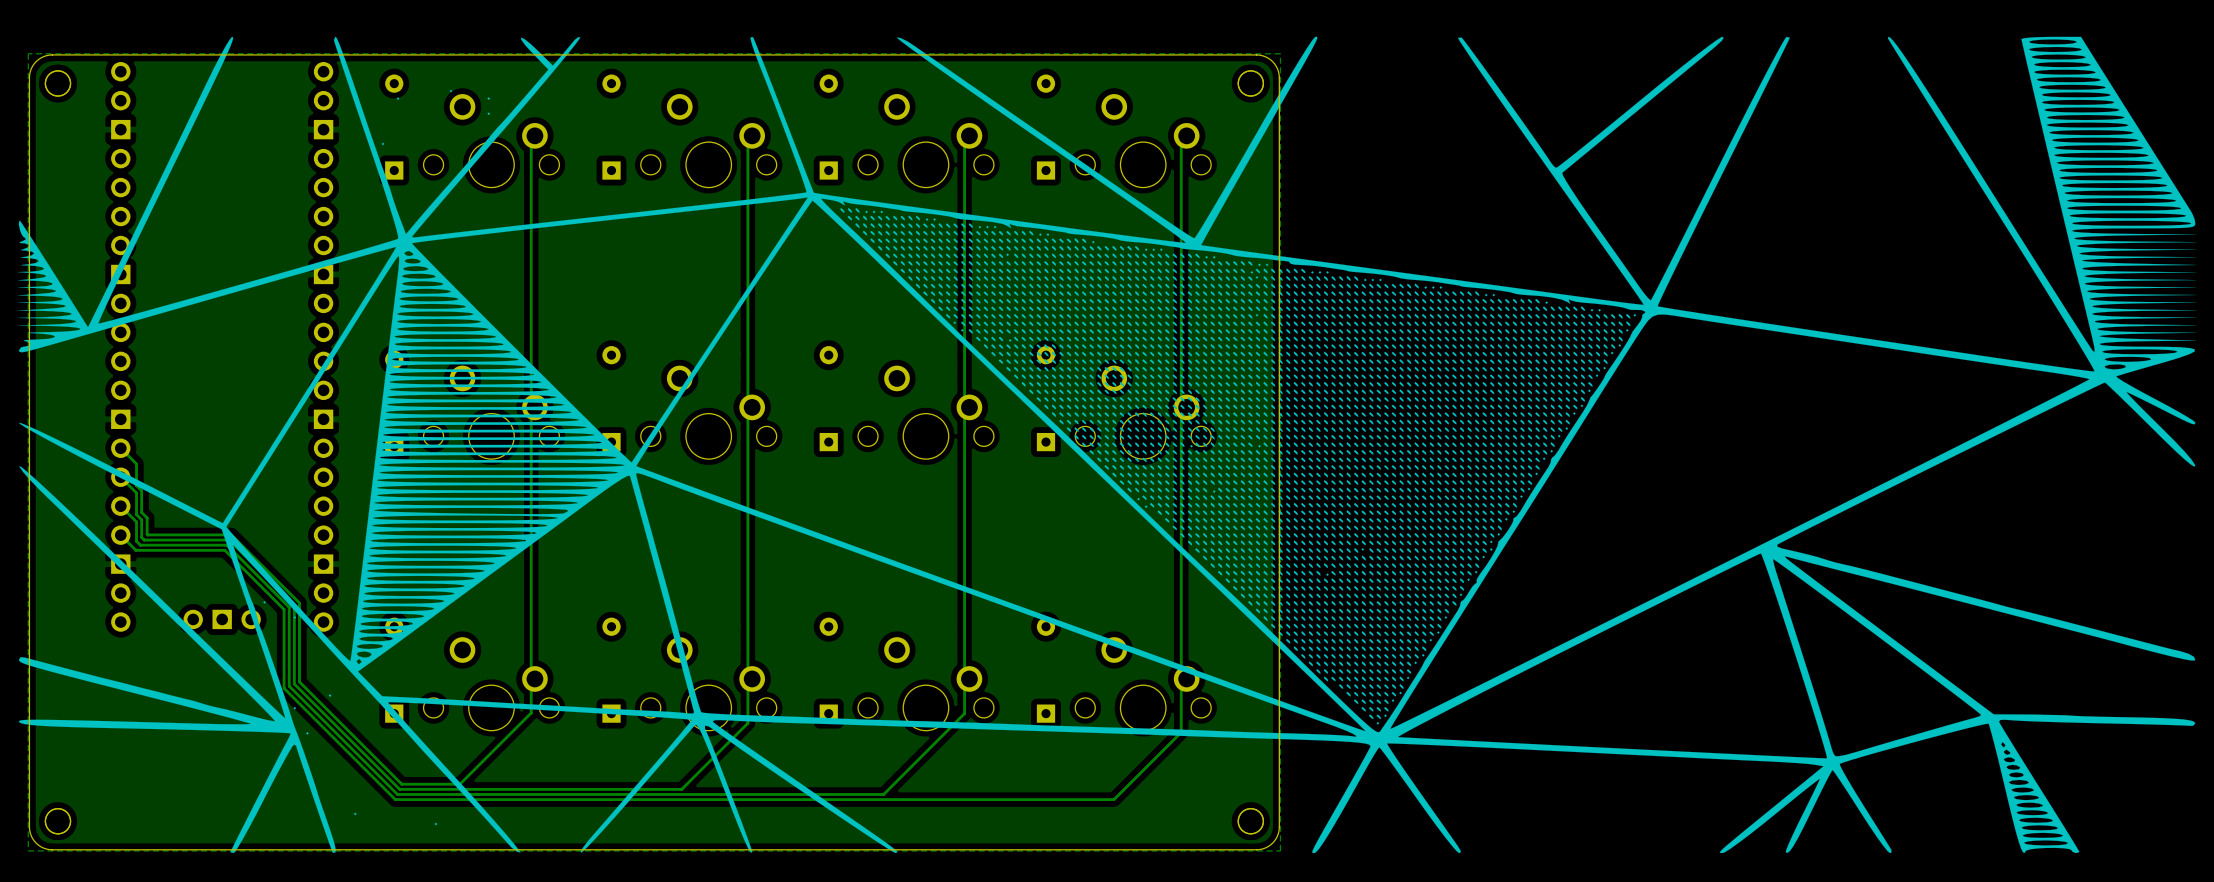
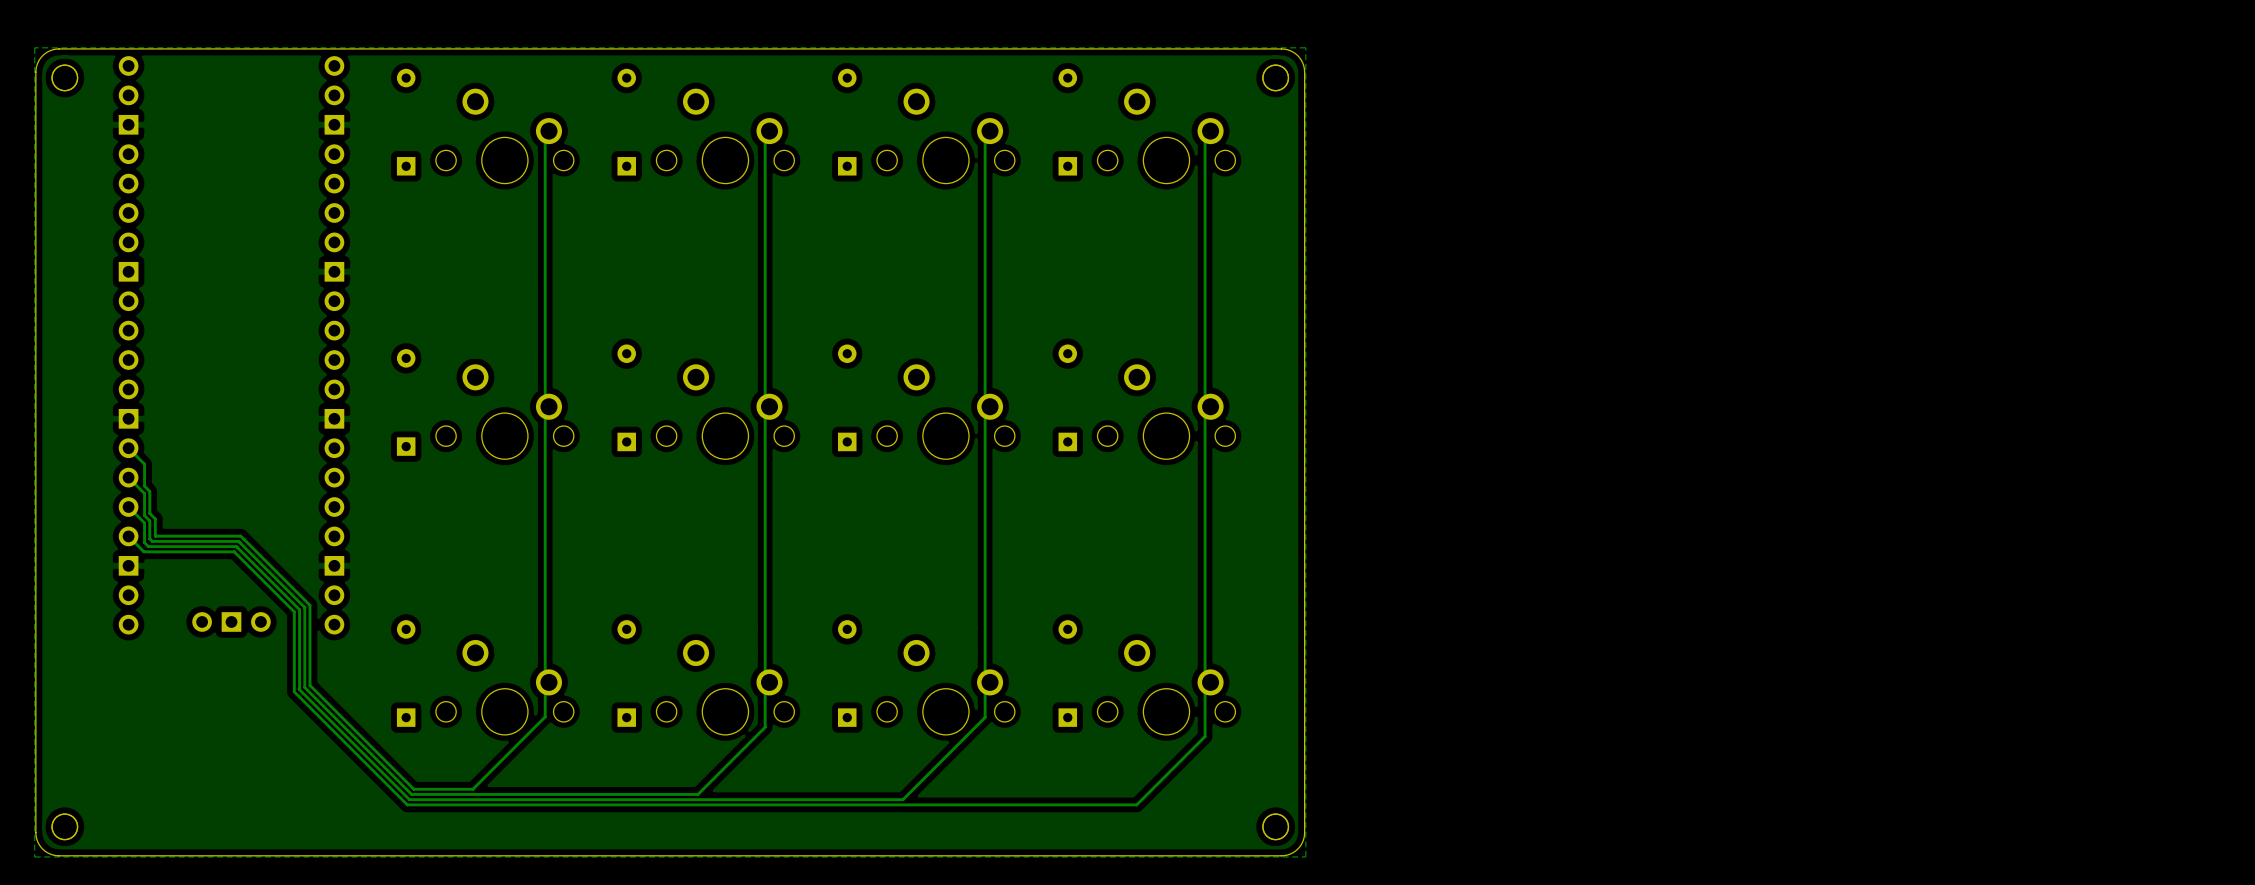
drawing: [17, 36, 2197, 854] -> none

